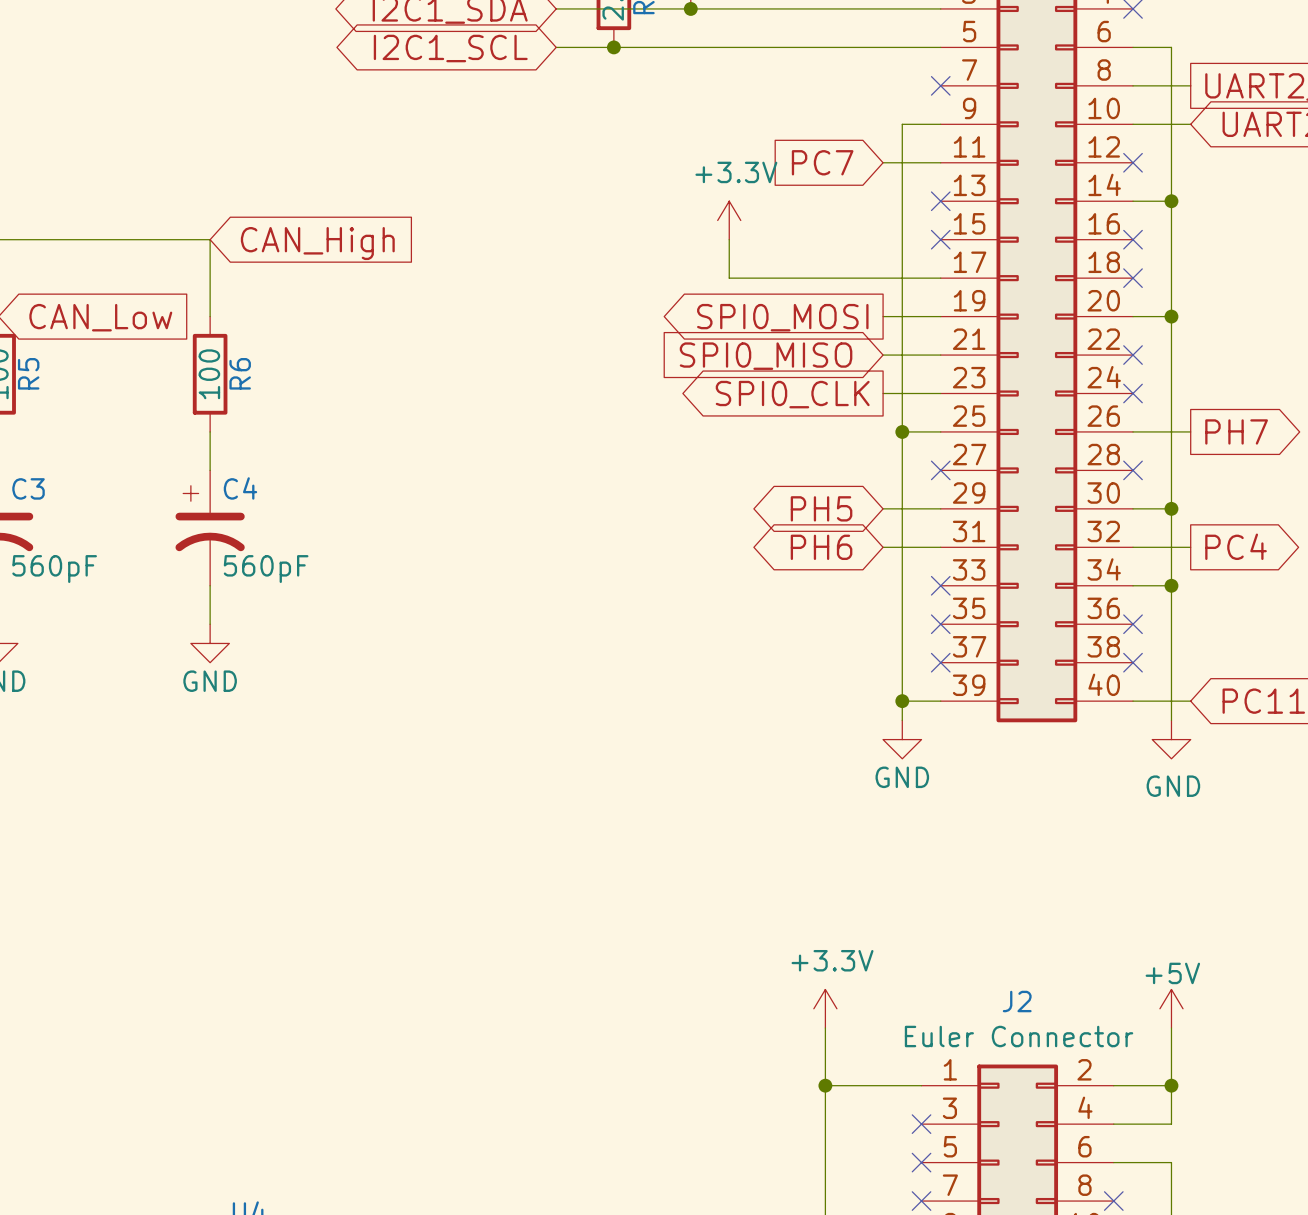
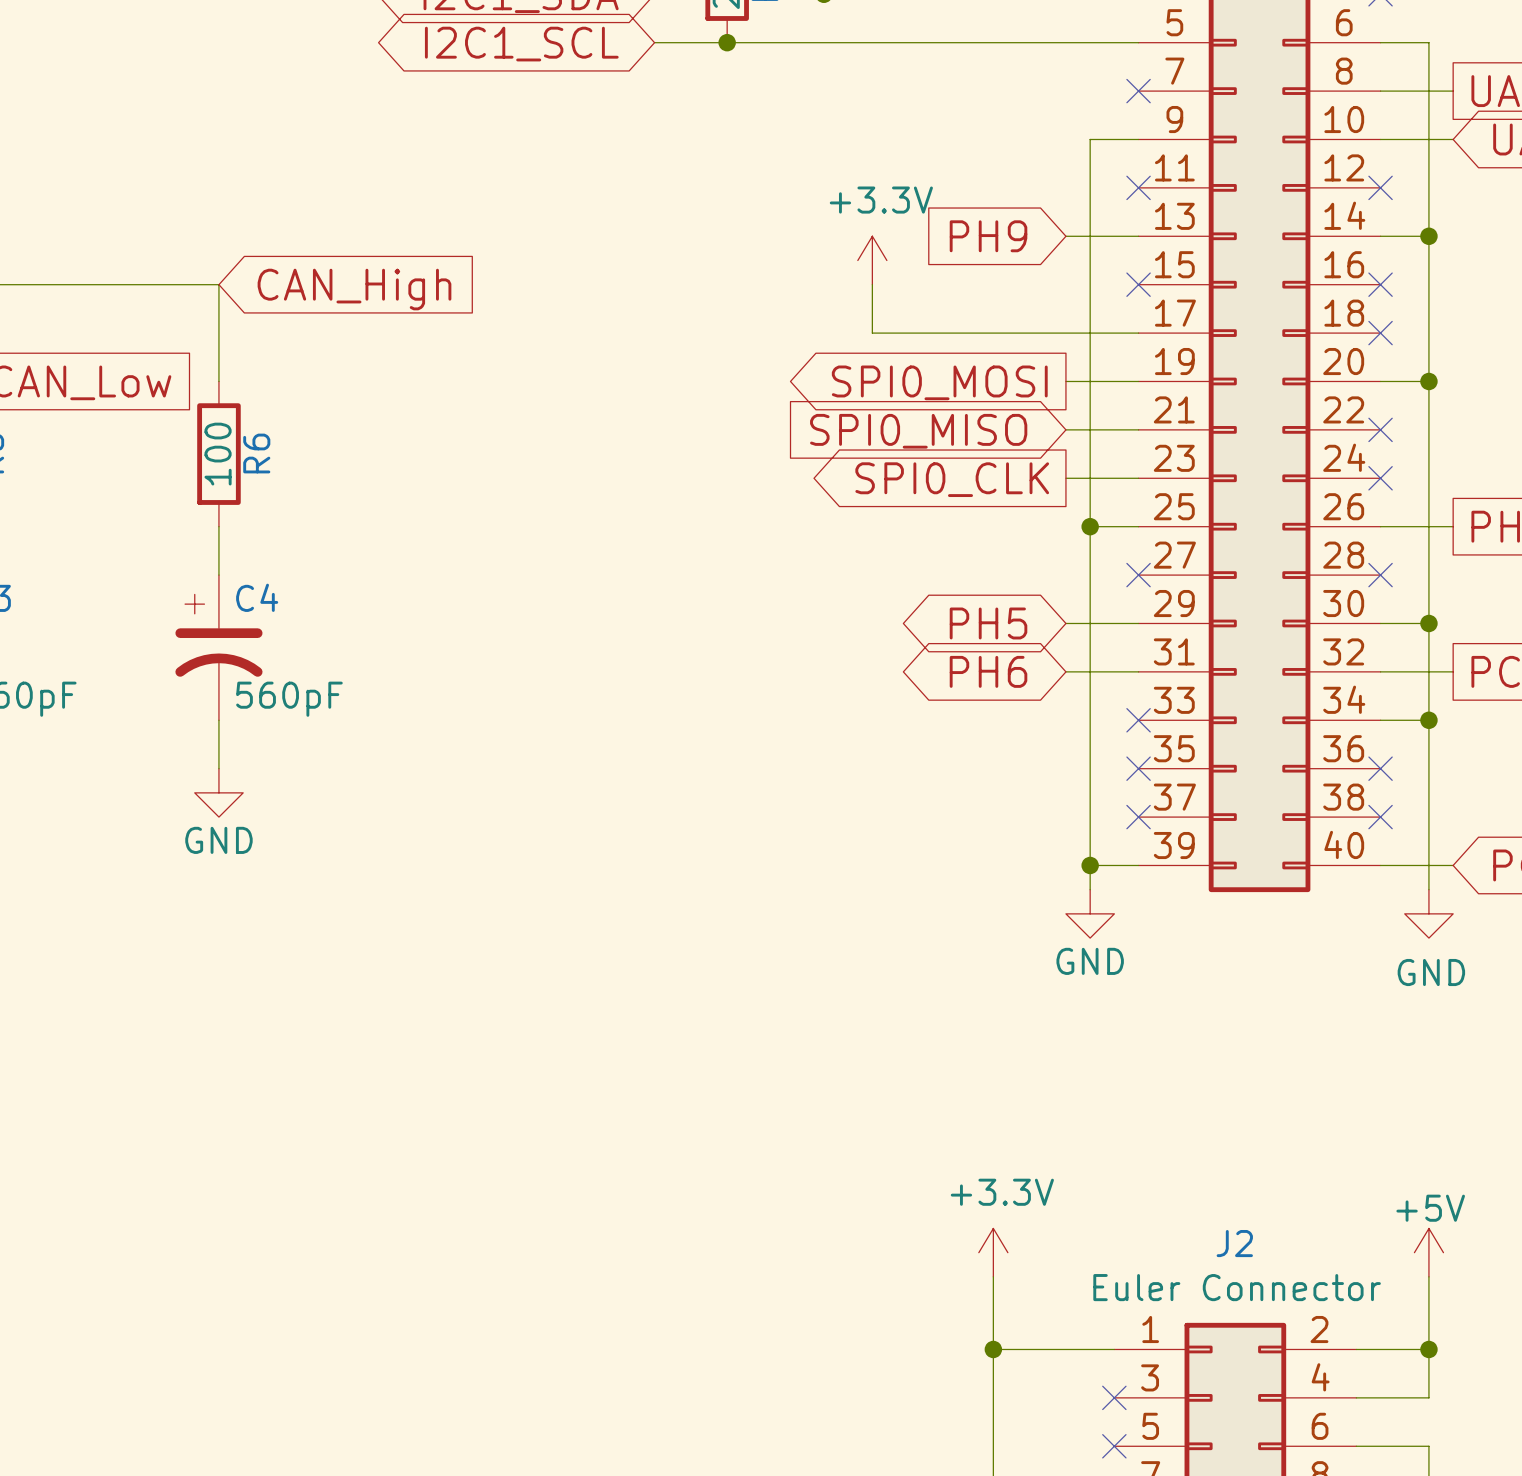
global label: PC7 (822, 162) -> none
wire: (883, 162) (940, 162) -> (1065, 236) (1138, 236)
global label: none -> PH9 (988, 236)
no-connect mark position: (940, 201) -> (1138, 187)

